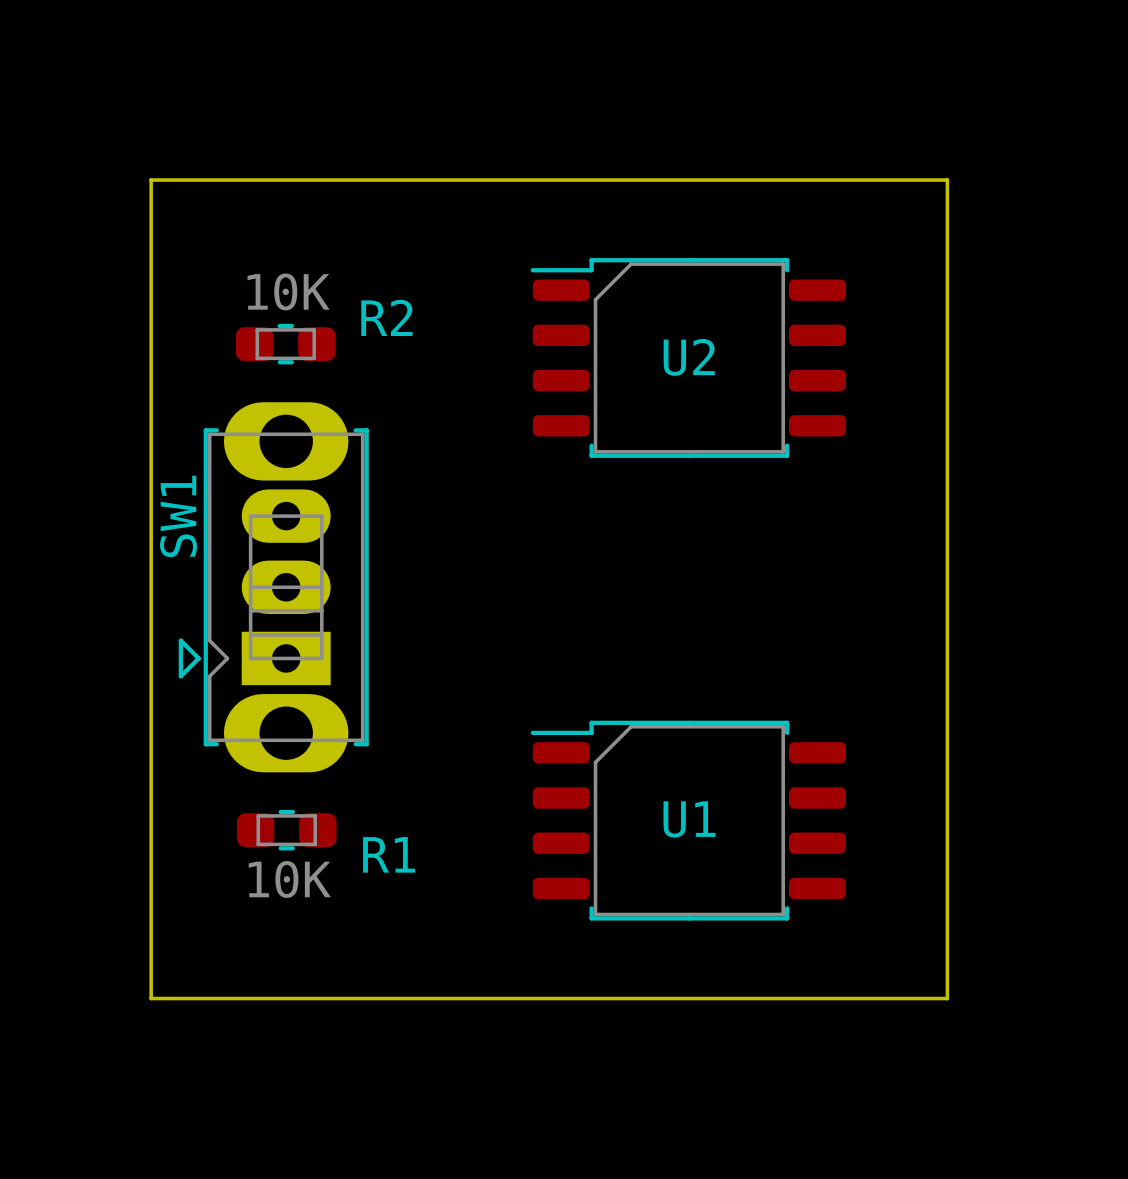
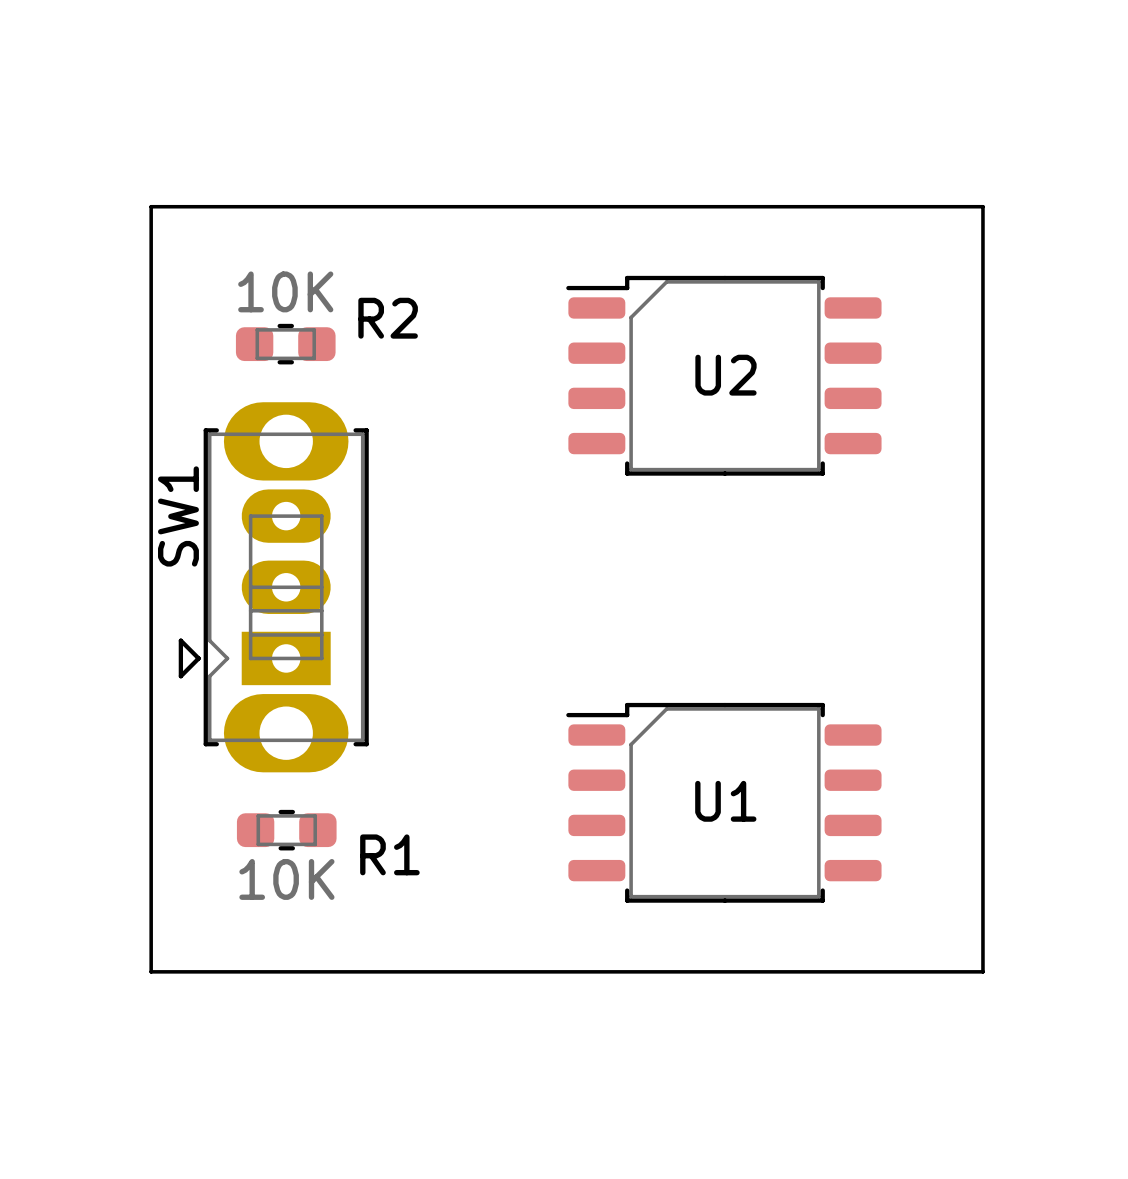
board edge: (151, 206) (151, 180) (947, 180) (947, 998) (151, 998) (151, 971) -> (151, 206) (982, 206) (982, 971) (151, 971)
U2 position: (688, 357) -> (723, 375)
U1 position: (688, 820) -> (723, 802)

